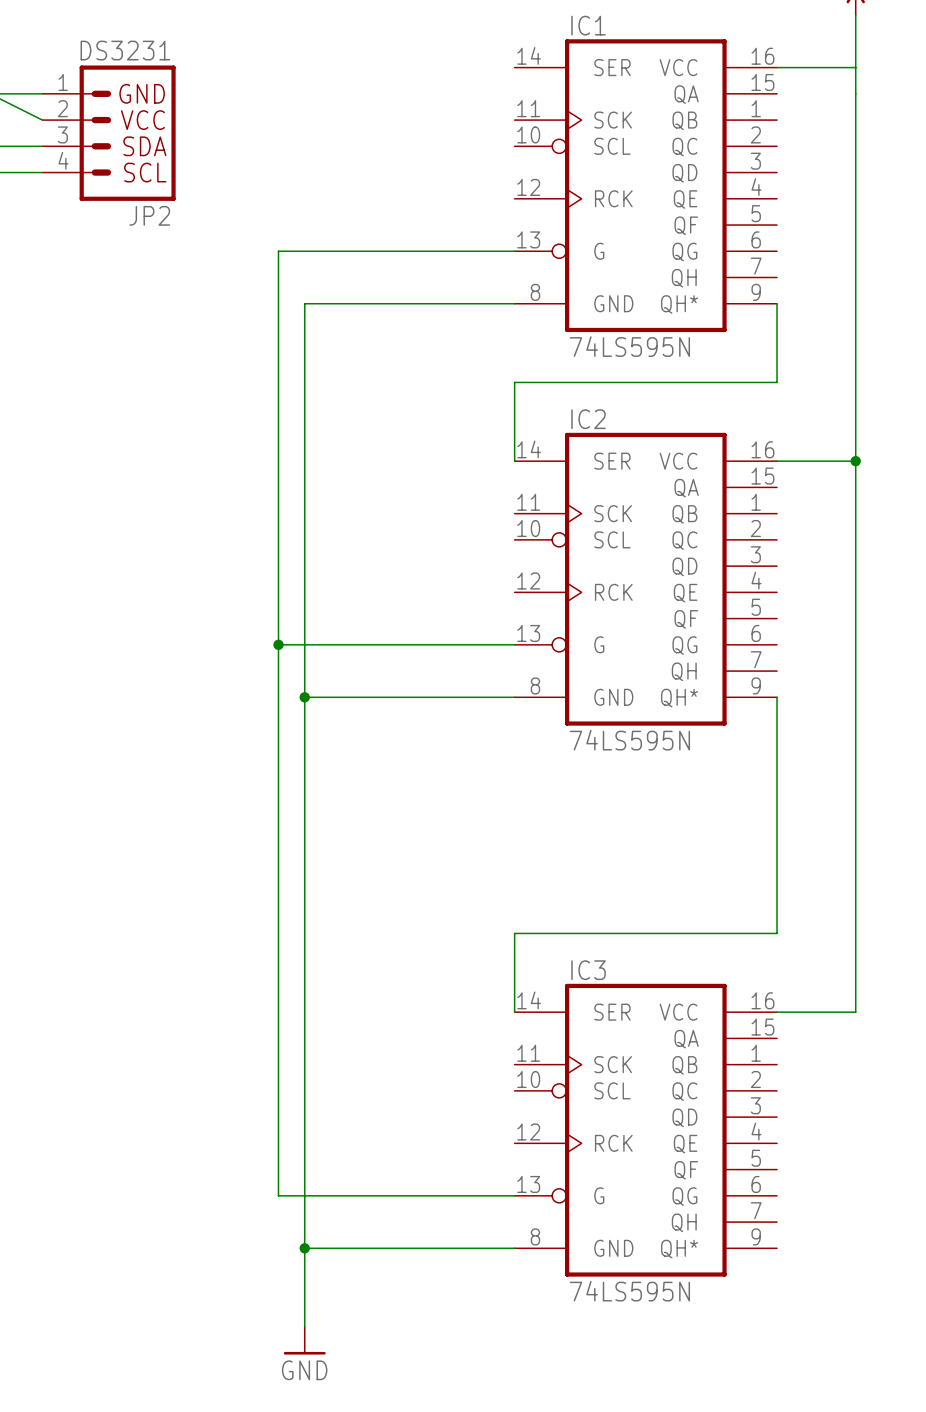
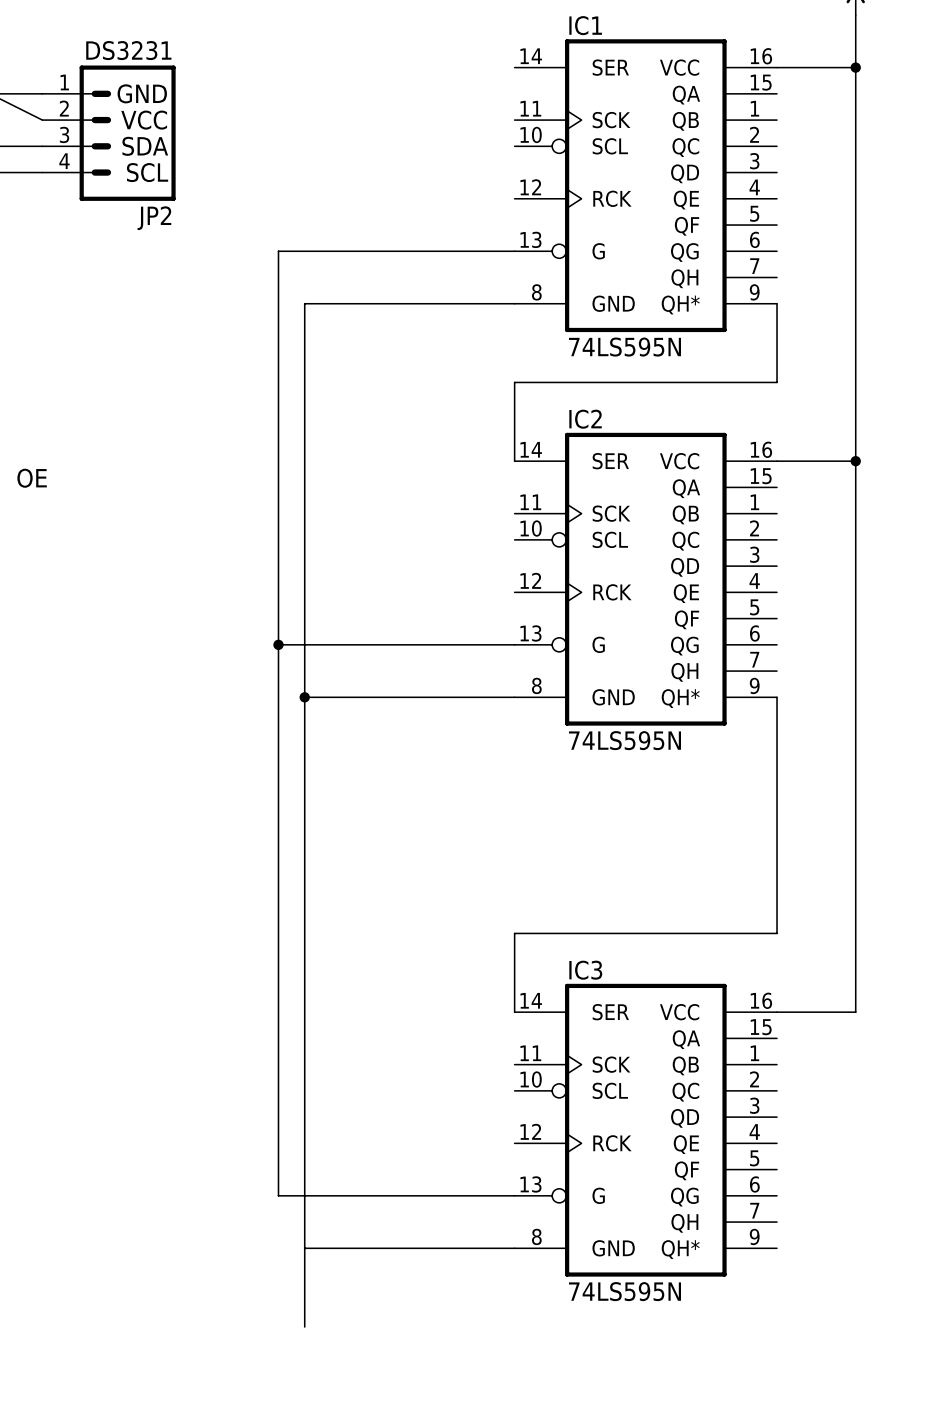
junction: none -> (855, 67)
text: none -> OE (32, 478)
junction: (304, 1248) -> none
power symbol: GND (304, 1340) -> none

